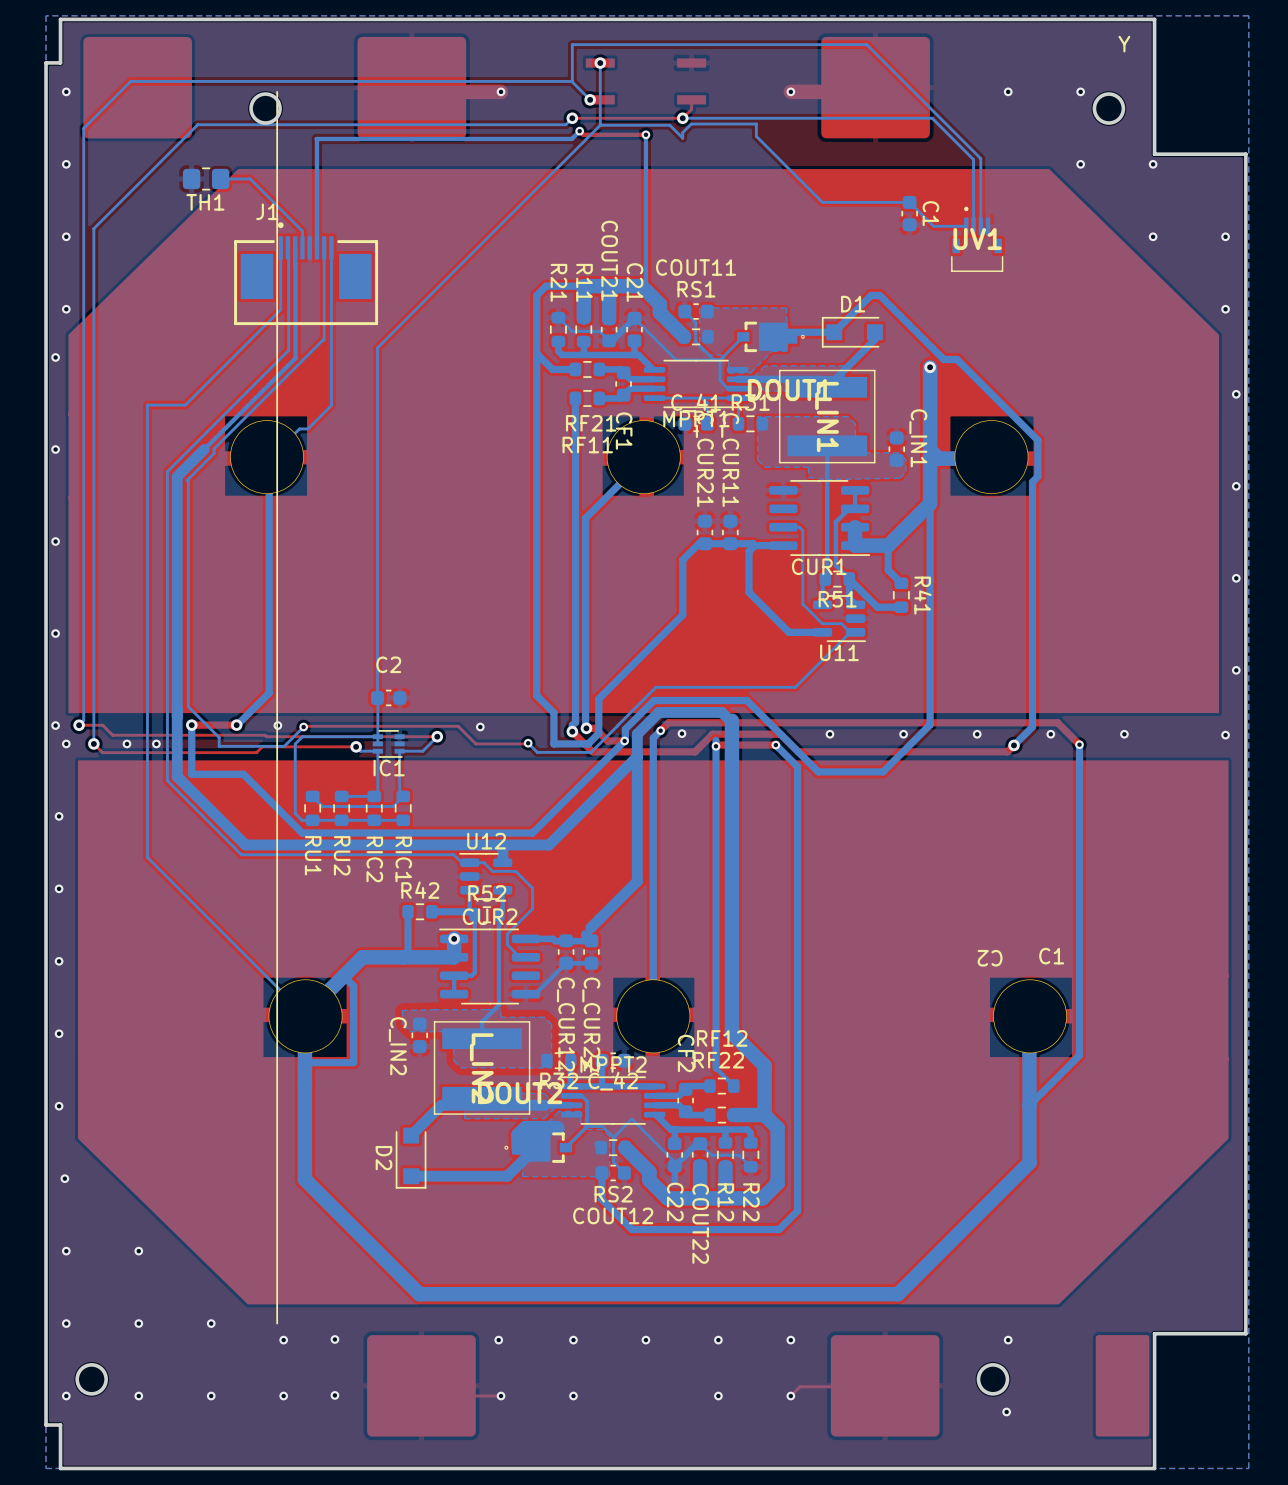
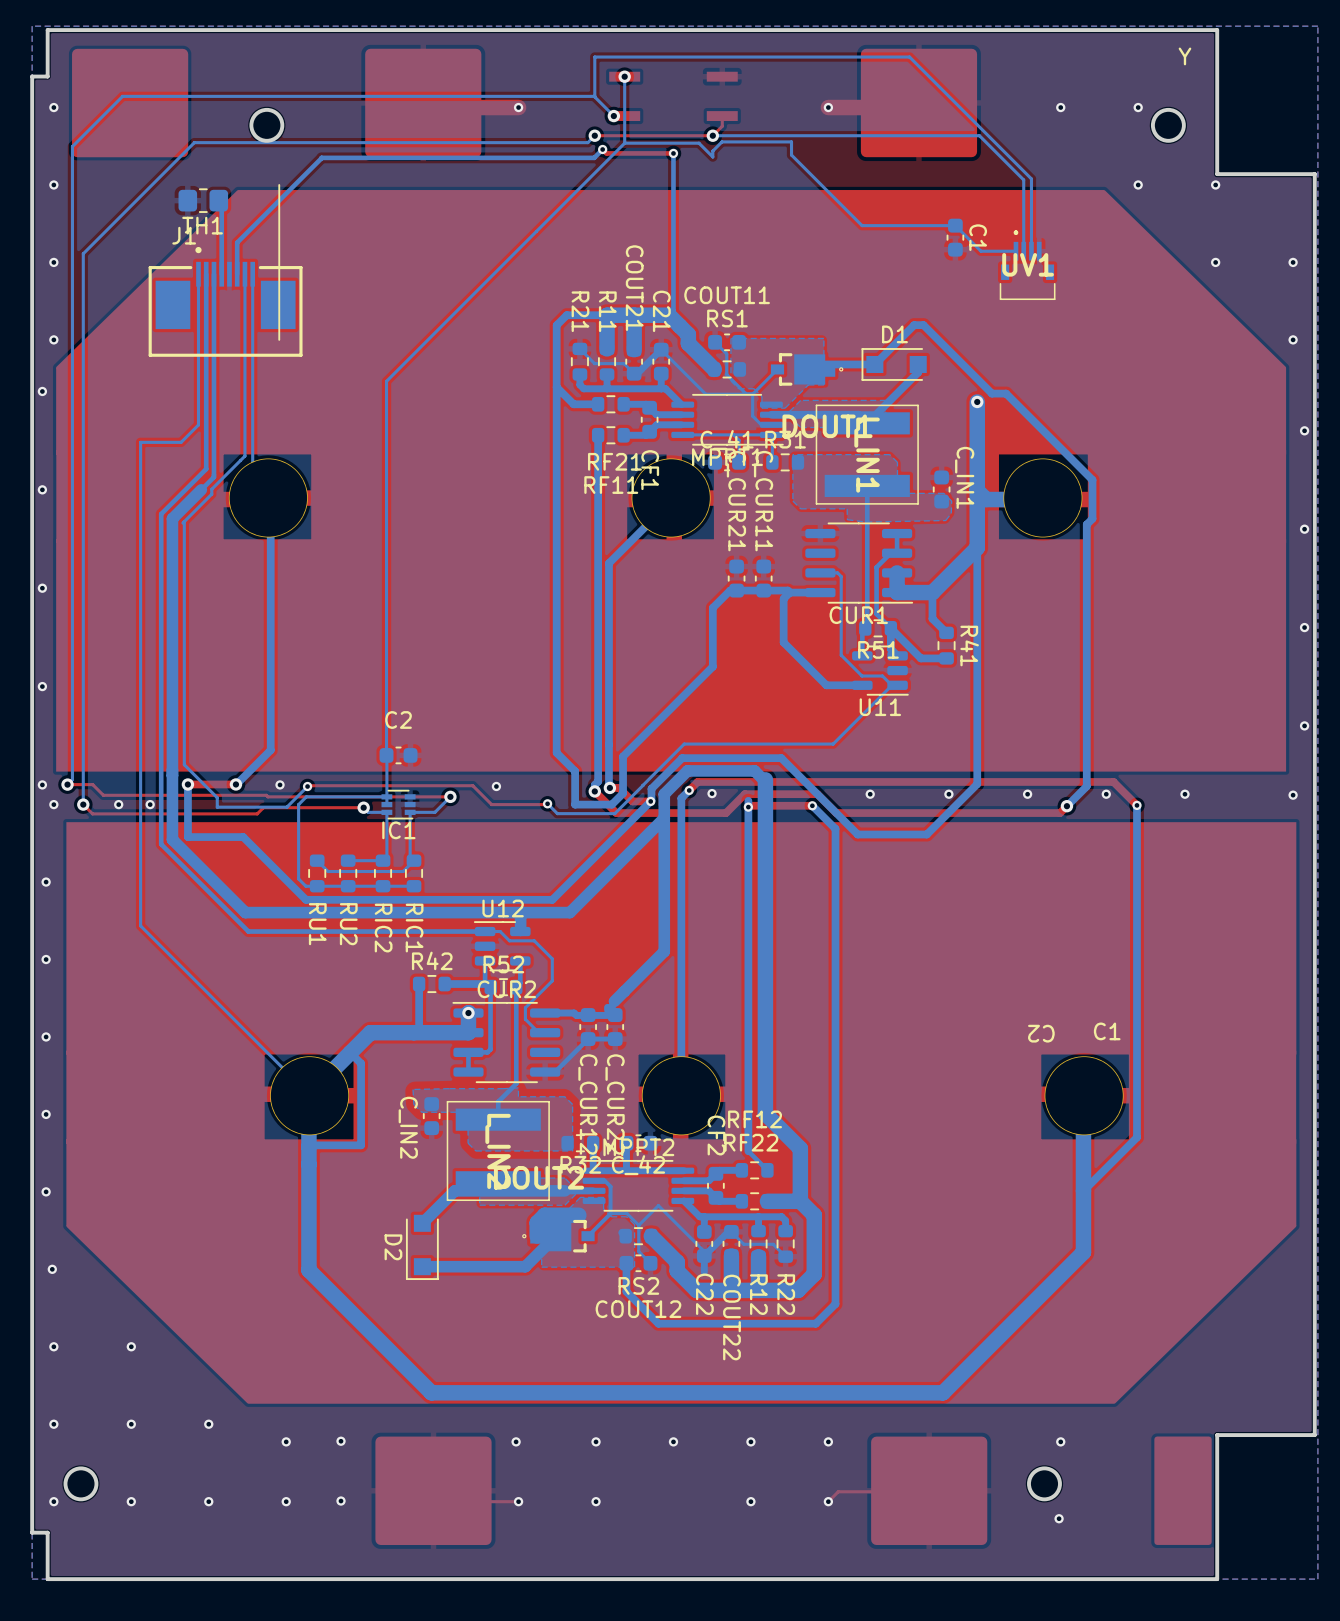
drawing shape: [44, 17, 1248, 1471] -> [30, 28, 1317, 1582]
bottom track: (316, 139) (316, 247) -> (321, 158) (237, 242) (237, 274)
bottom track: (220, 178) (250, 178) (302, 231) (302, 247) -> (218, 200) (221, 203) (221, 274)
bottom track: none -> (206, 274) (206, 469) (161, 514) (161, 844) (248, 931) (485, 931)
bottom track: none -> (252, 274) (252, 482) (268, 497)
bottom track: (280, 247) (280, 309) (201, 388) -> (198, 274) (198, 425)
bottom track: (287, 247) (288, 350) (167, 471) (167, 780) (241, 854) (453, 854) (461, 862) -> none
bottom track: (295, 247) (295, 358) (216, 437) -> (213, 274) (213, 477)
bottom track: (324, 247) (324, 339) (245, 417) -> (244, 274) (244, 456)
bottom track: (331, 247) (331, 405) (308, 428) (299, 428) (269, 458) -> none
J1 position: (306, 273) -> (225, 301)

